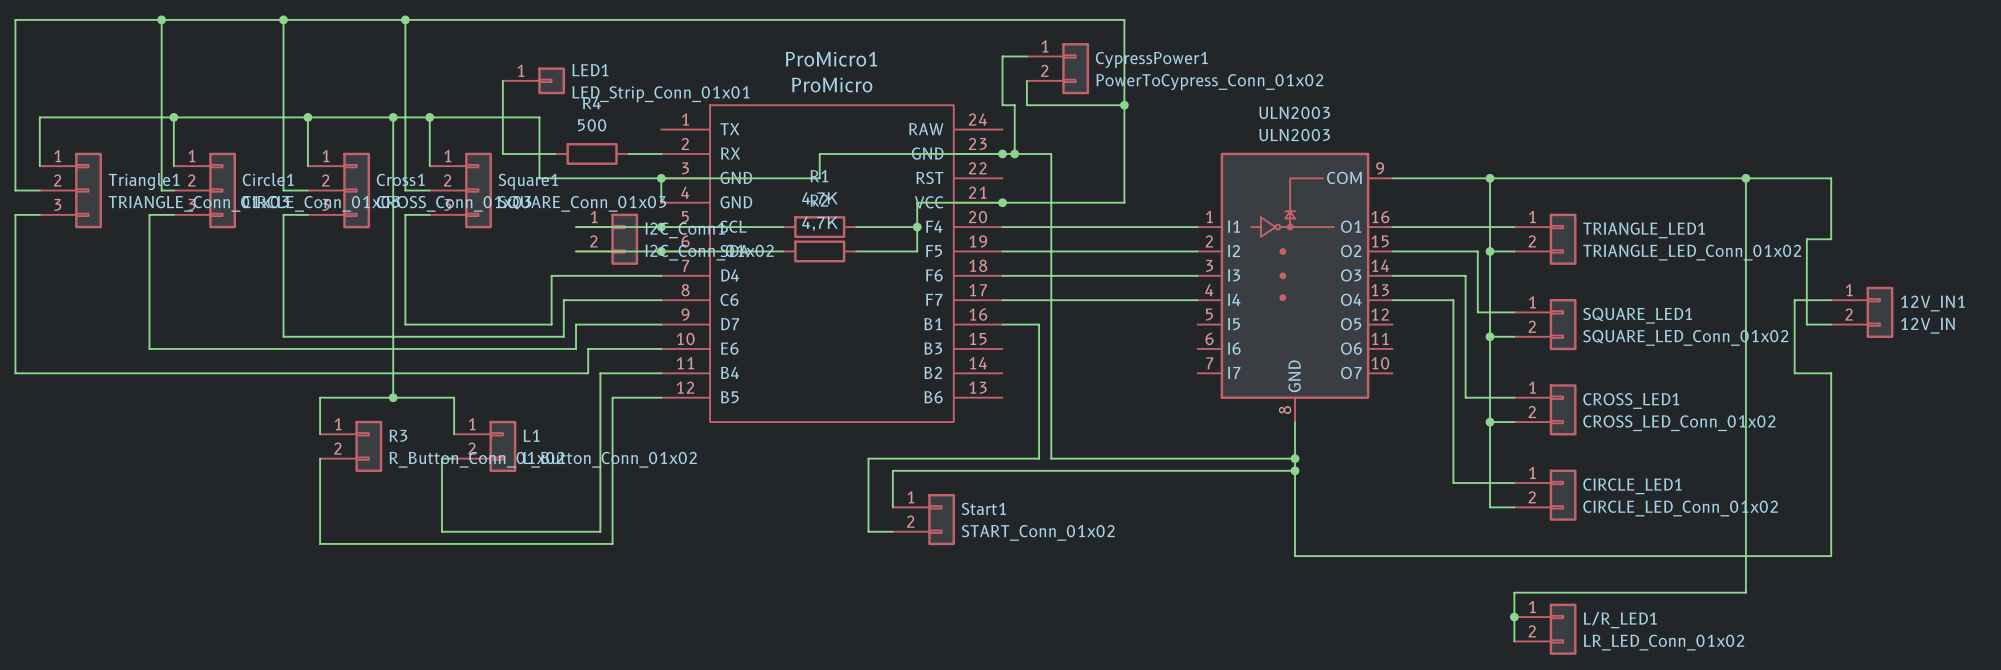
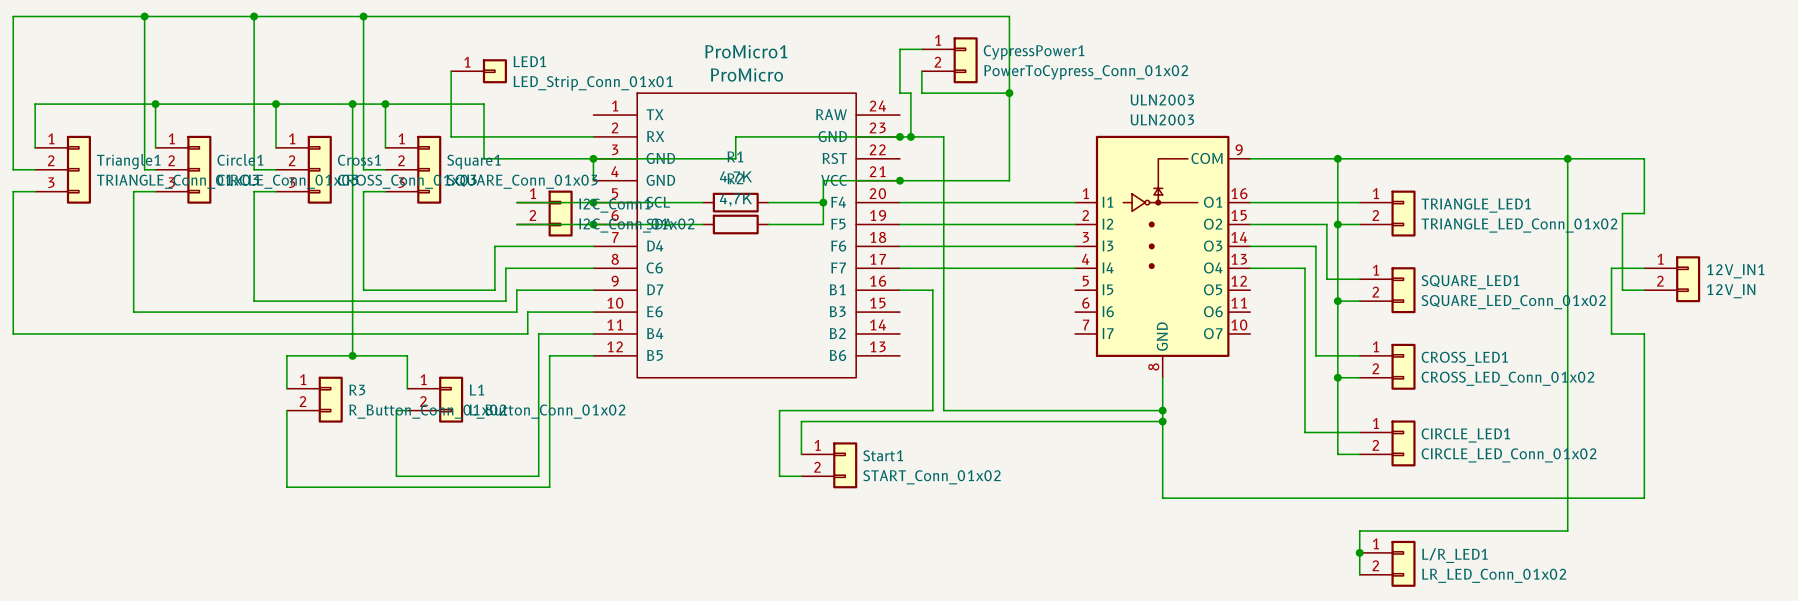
wire: none -> (498, 136) (564, 136)
R4: 500 (592, 153) -> none

